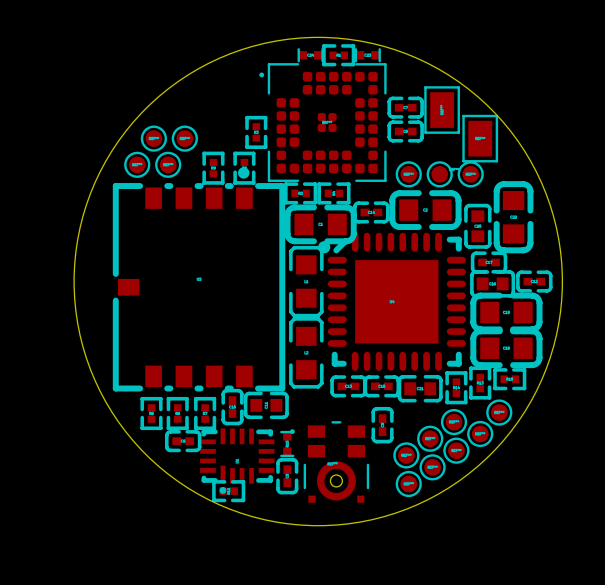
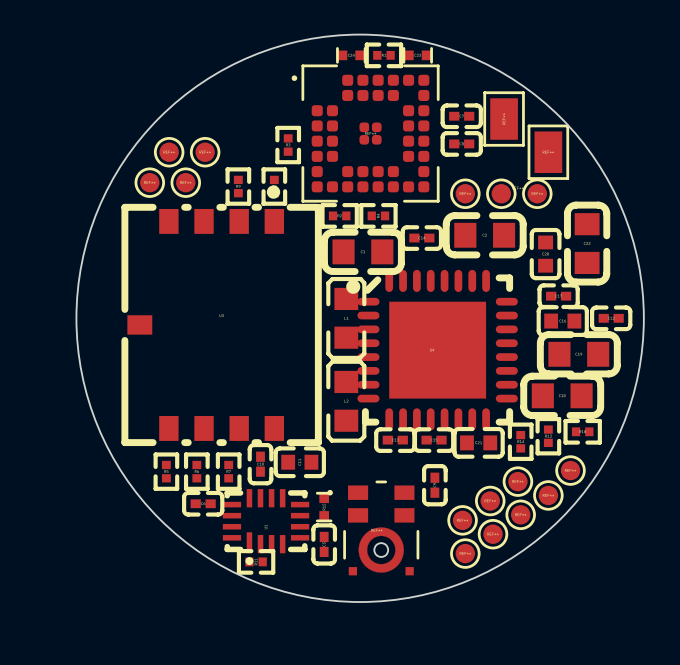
part position: (392, 301) -> (432, 350)
part position: (506, 348) -> (562, 395)

